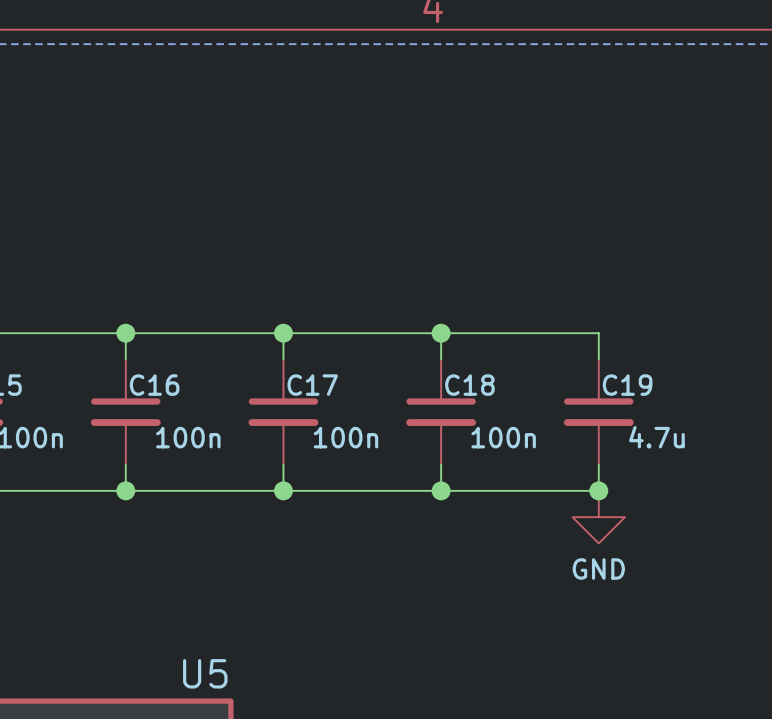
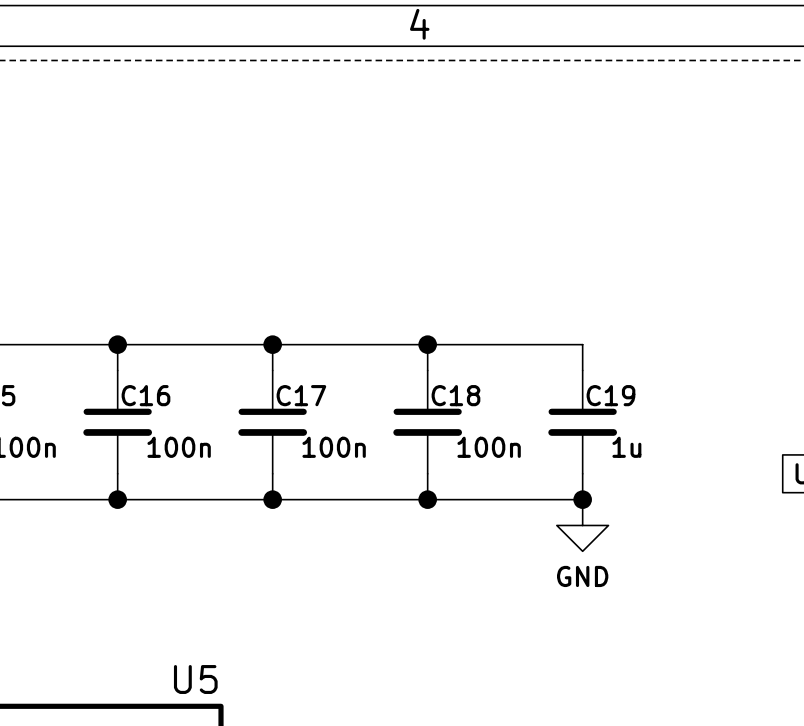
C19 value: 4.7u (656, 437) -> 1u (626, 447)

